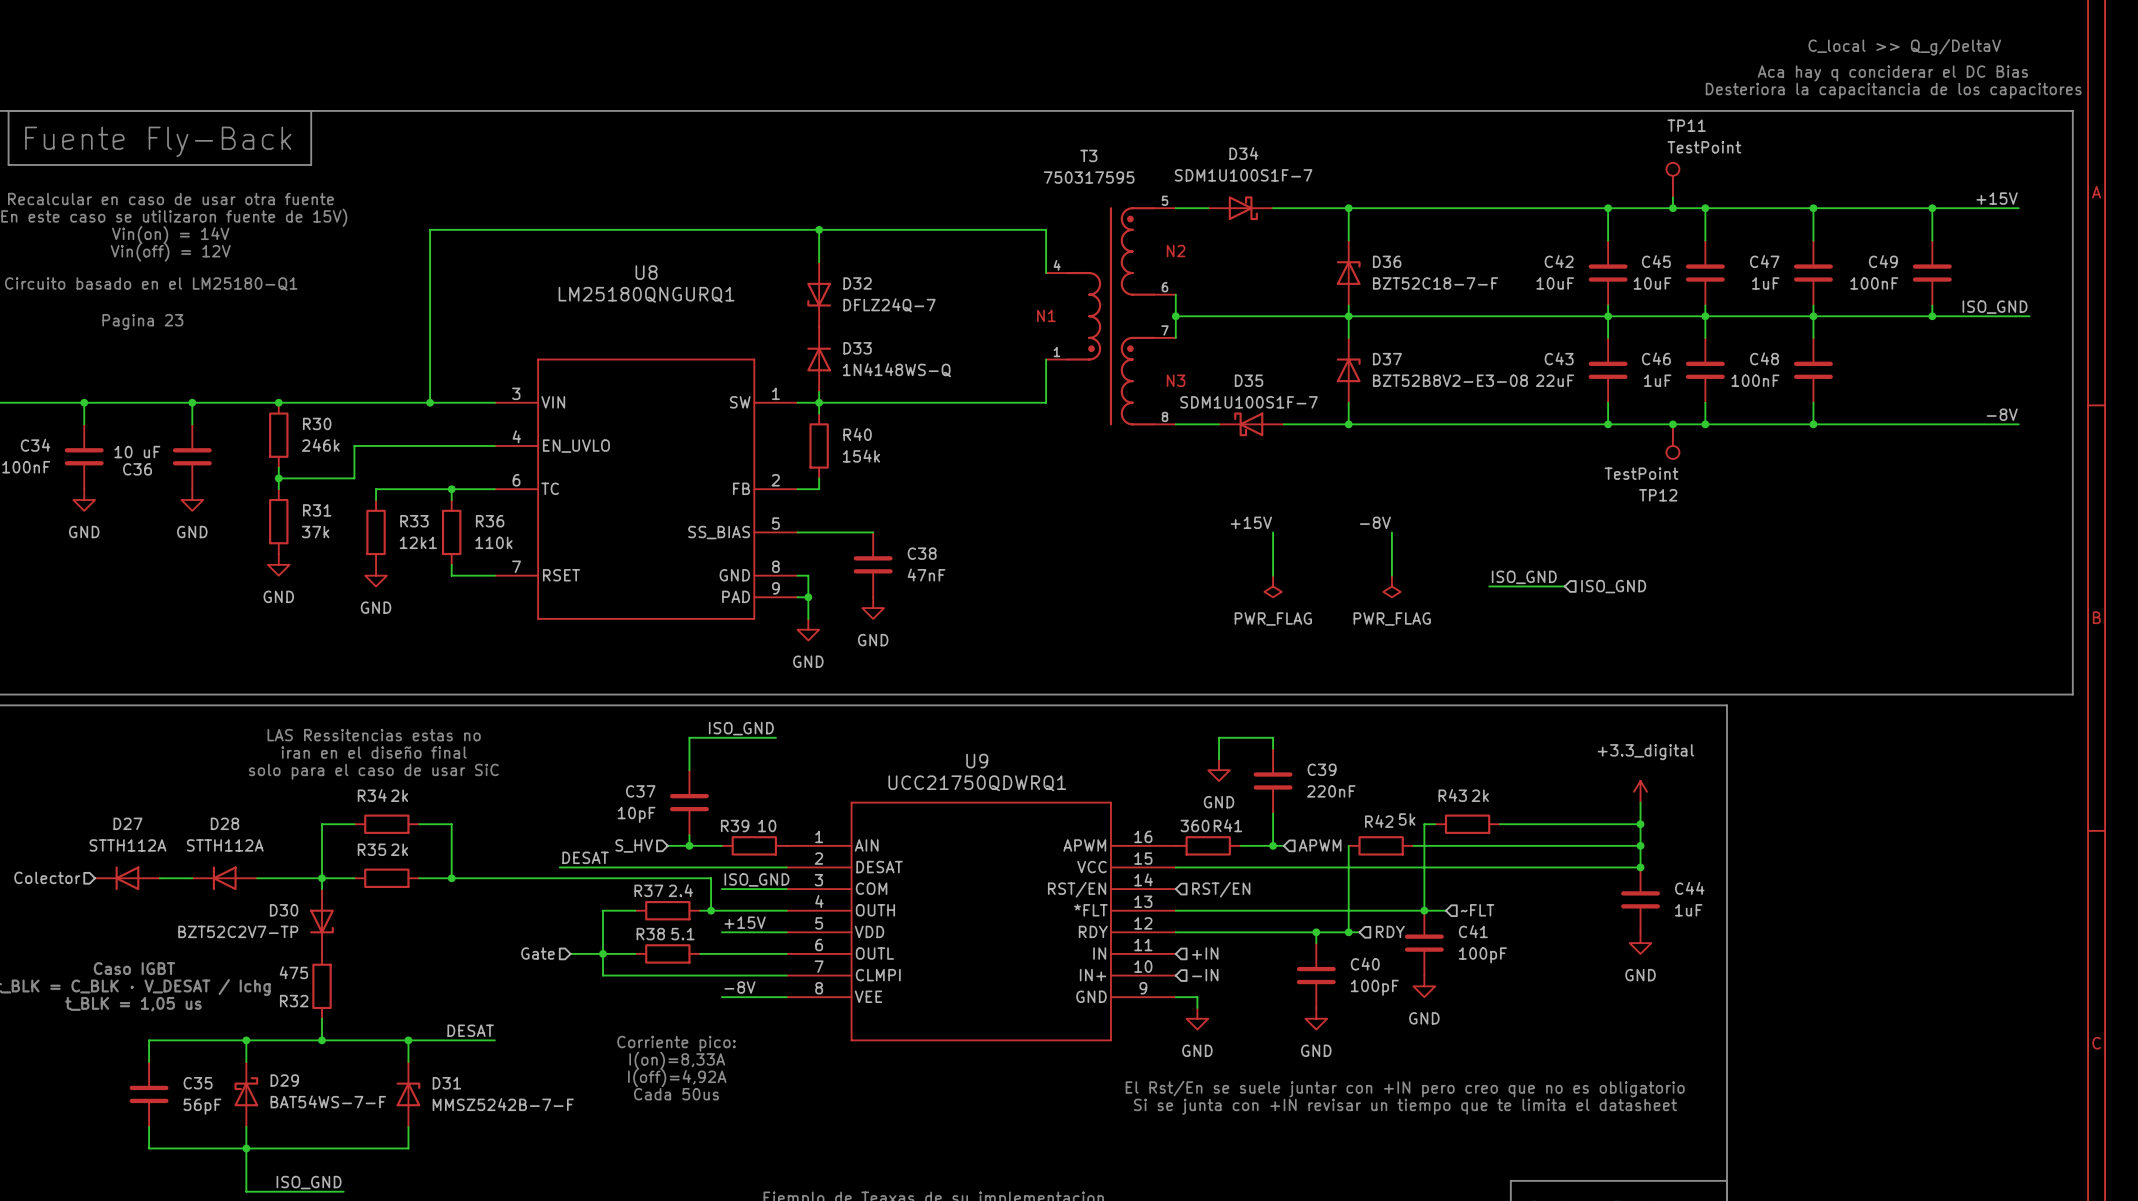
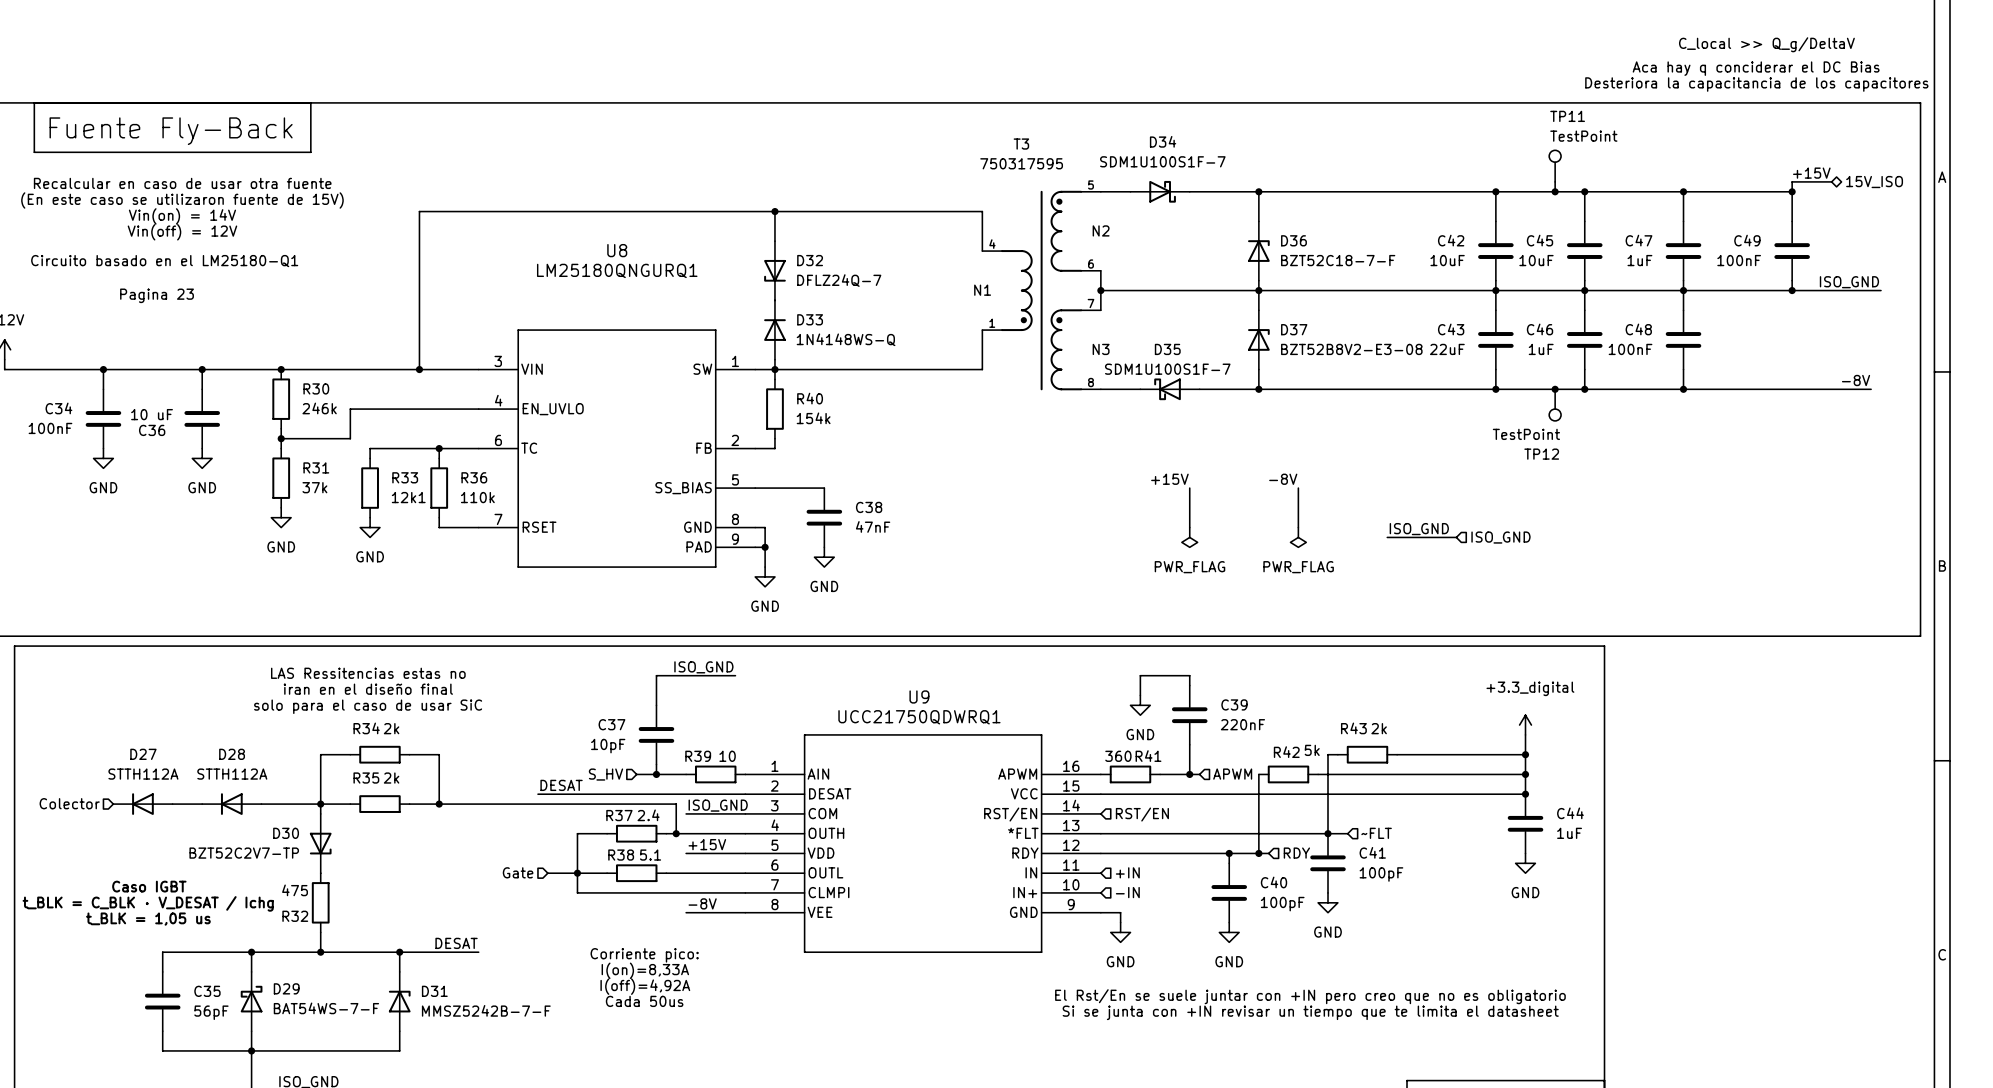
hierarchical label: none -> 15V_ISO (1874, 182)
label position: +15V (1997, 198) -> +15V (1811, 173)
wire: (1932, 208) (2018, 208) -> (1792, 191) (1792, 181) (1831, 181)

